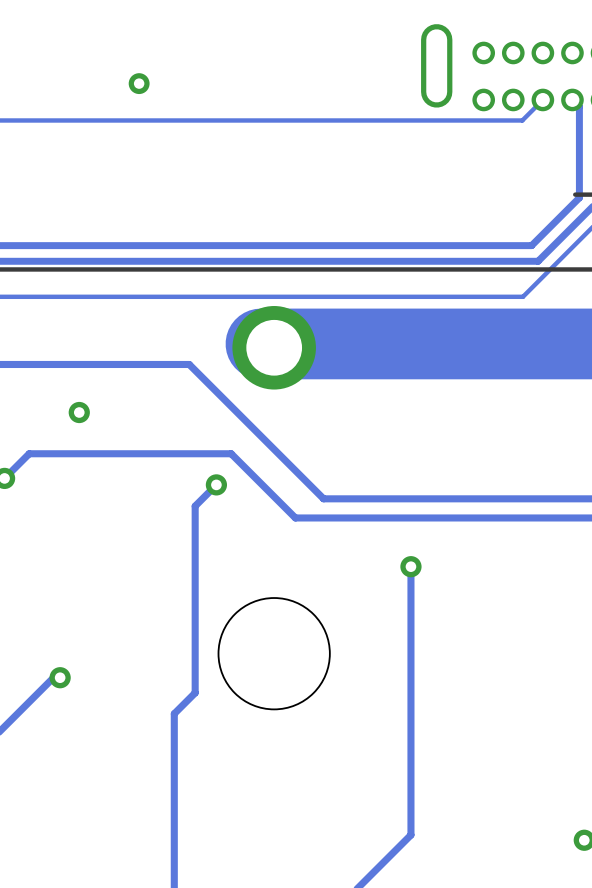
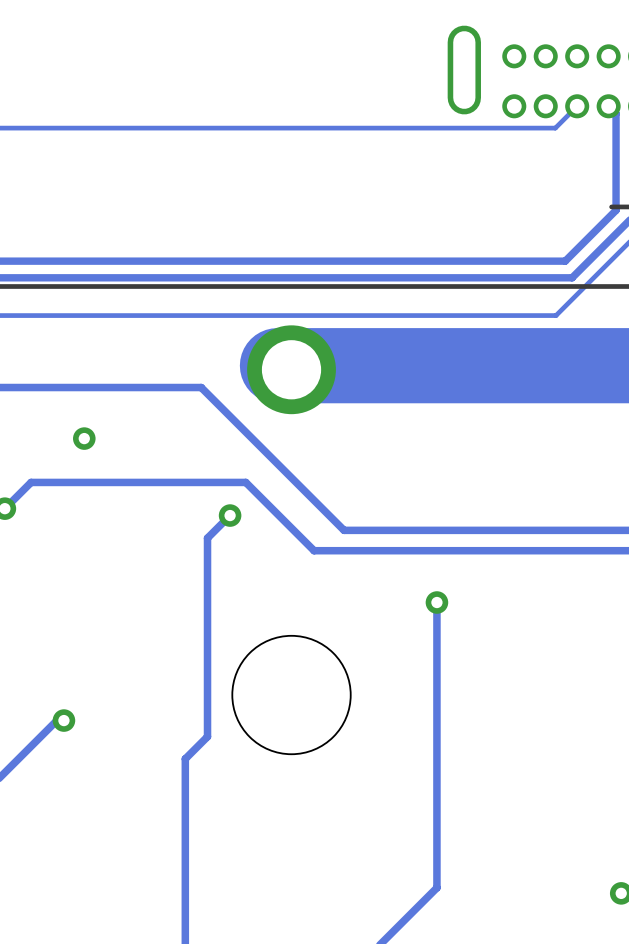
via: (139, 83) -> none

